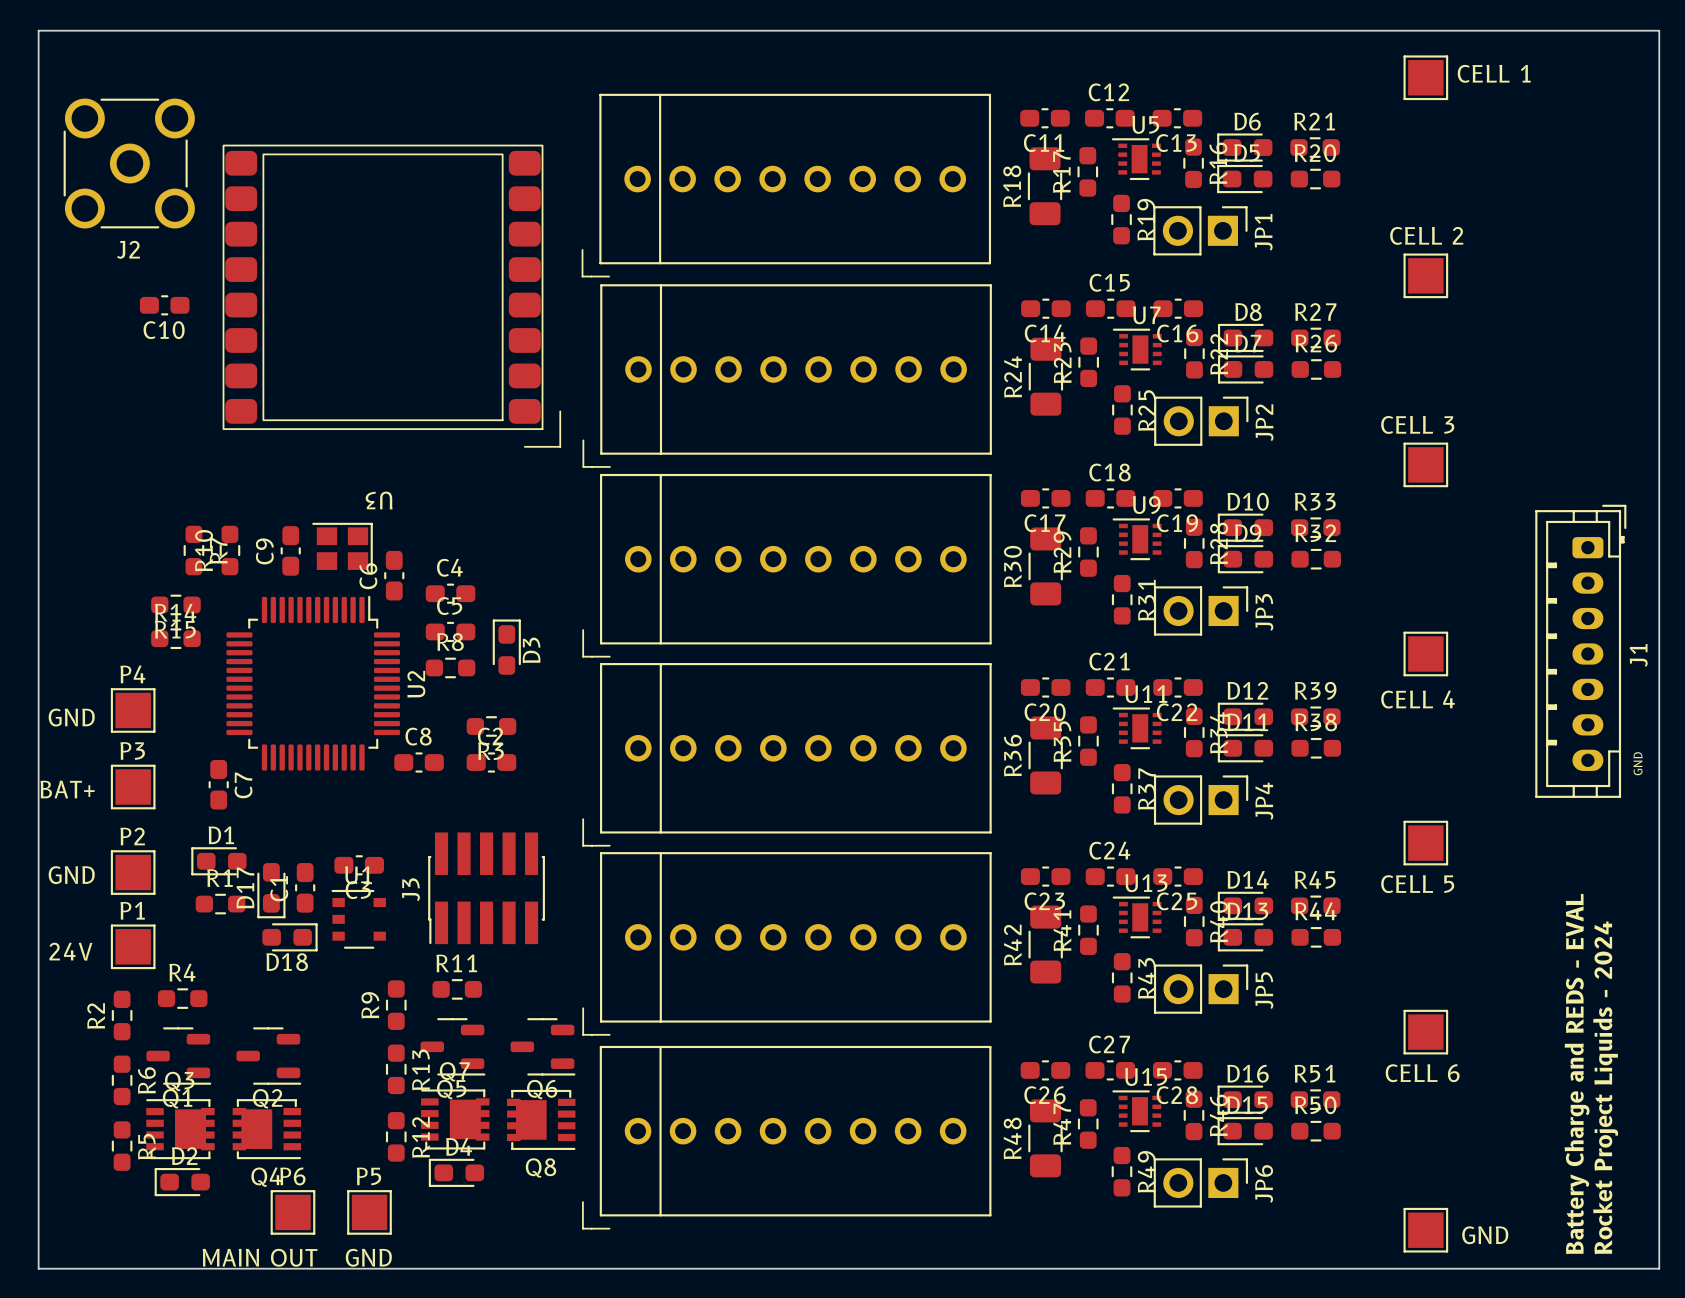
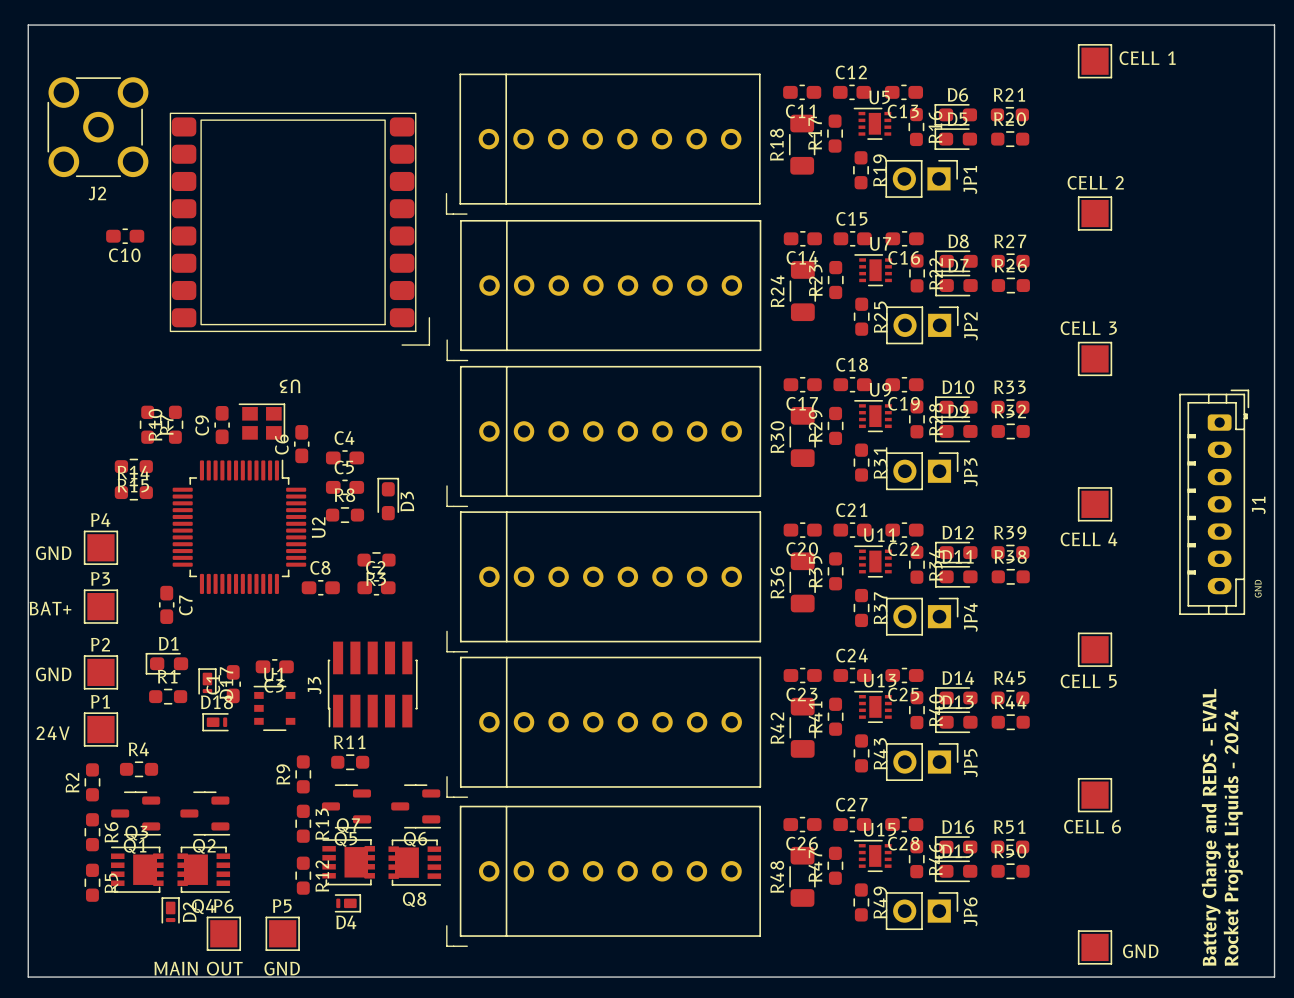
D17 footprint: [257, 863, 286, 919] -> [198, 668, 217, 695]
D17 name position: D17 (245, 888) -> D17 (226, 683)
D18 footprint: [262, 923, 318, 952] -> [202, 713, 229, 732]
D18 name position: D18 (287, 962) -> D18 (216, 702)
D4 name position: D4 (459, 1146) -> D4 (346, 922)
D4 footprint: [428, 1158, 485, 1187] -> [334, 894, 362, 913]
D2 footprint: [154, 1167, 210, 1197] -> [161, 897, 180, 924]

